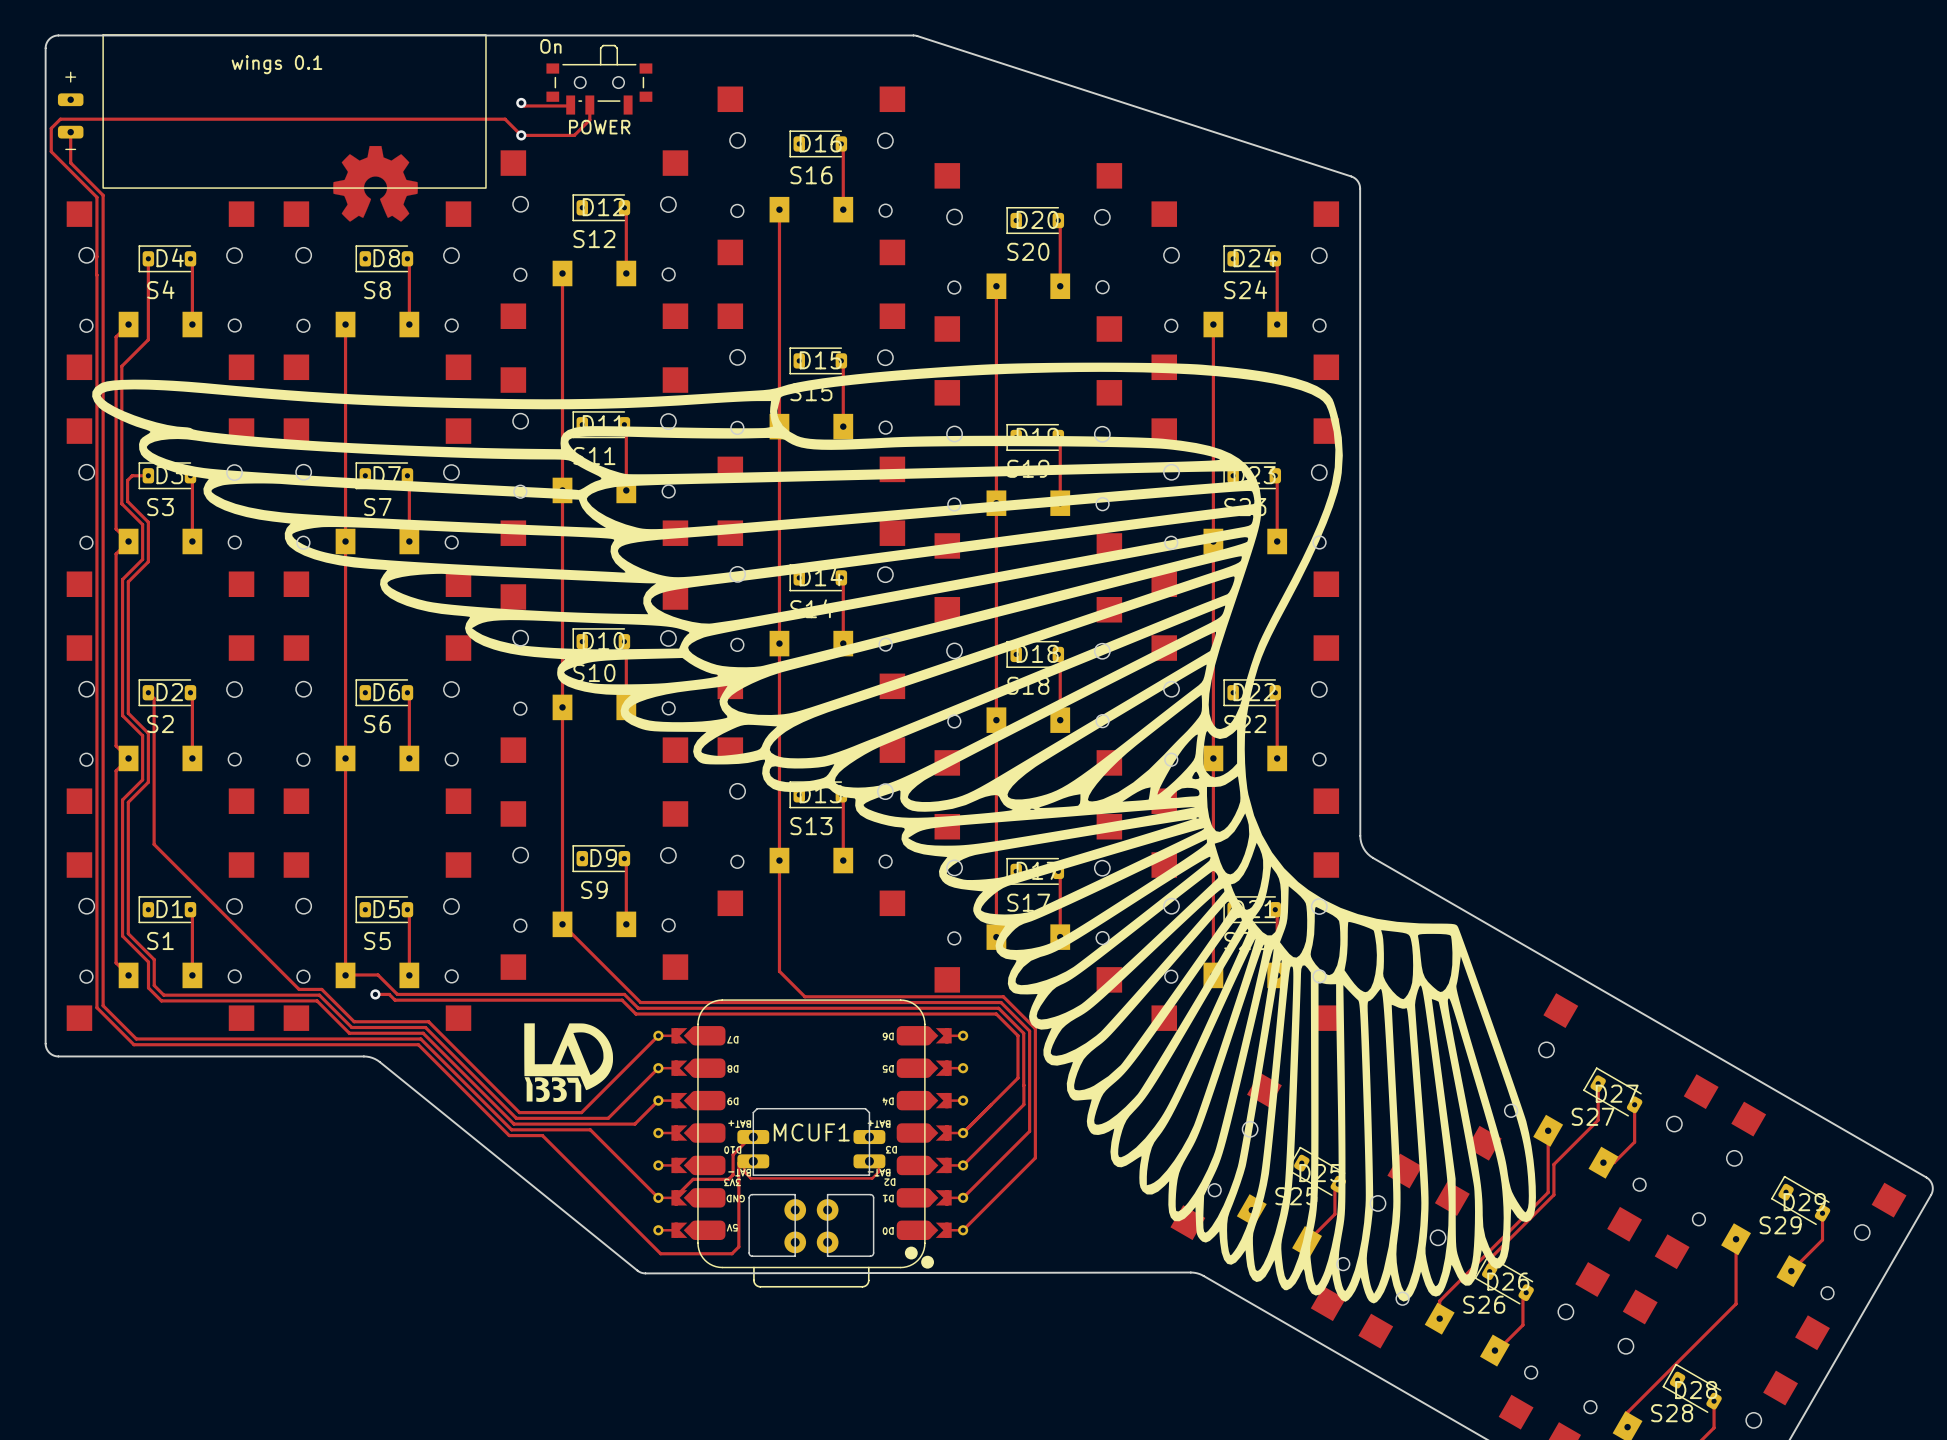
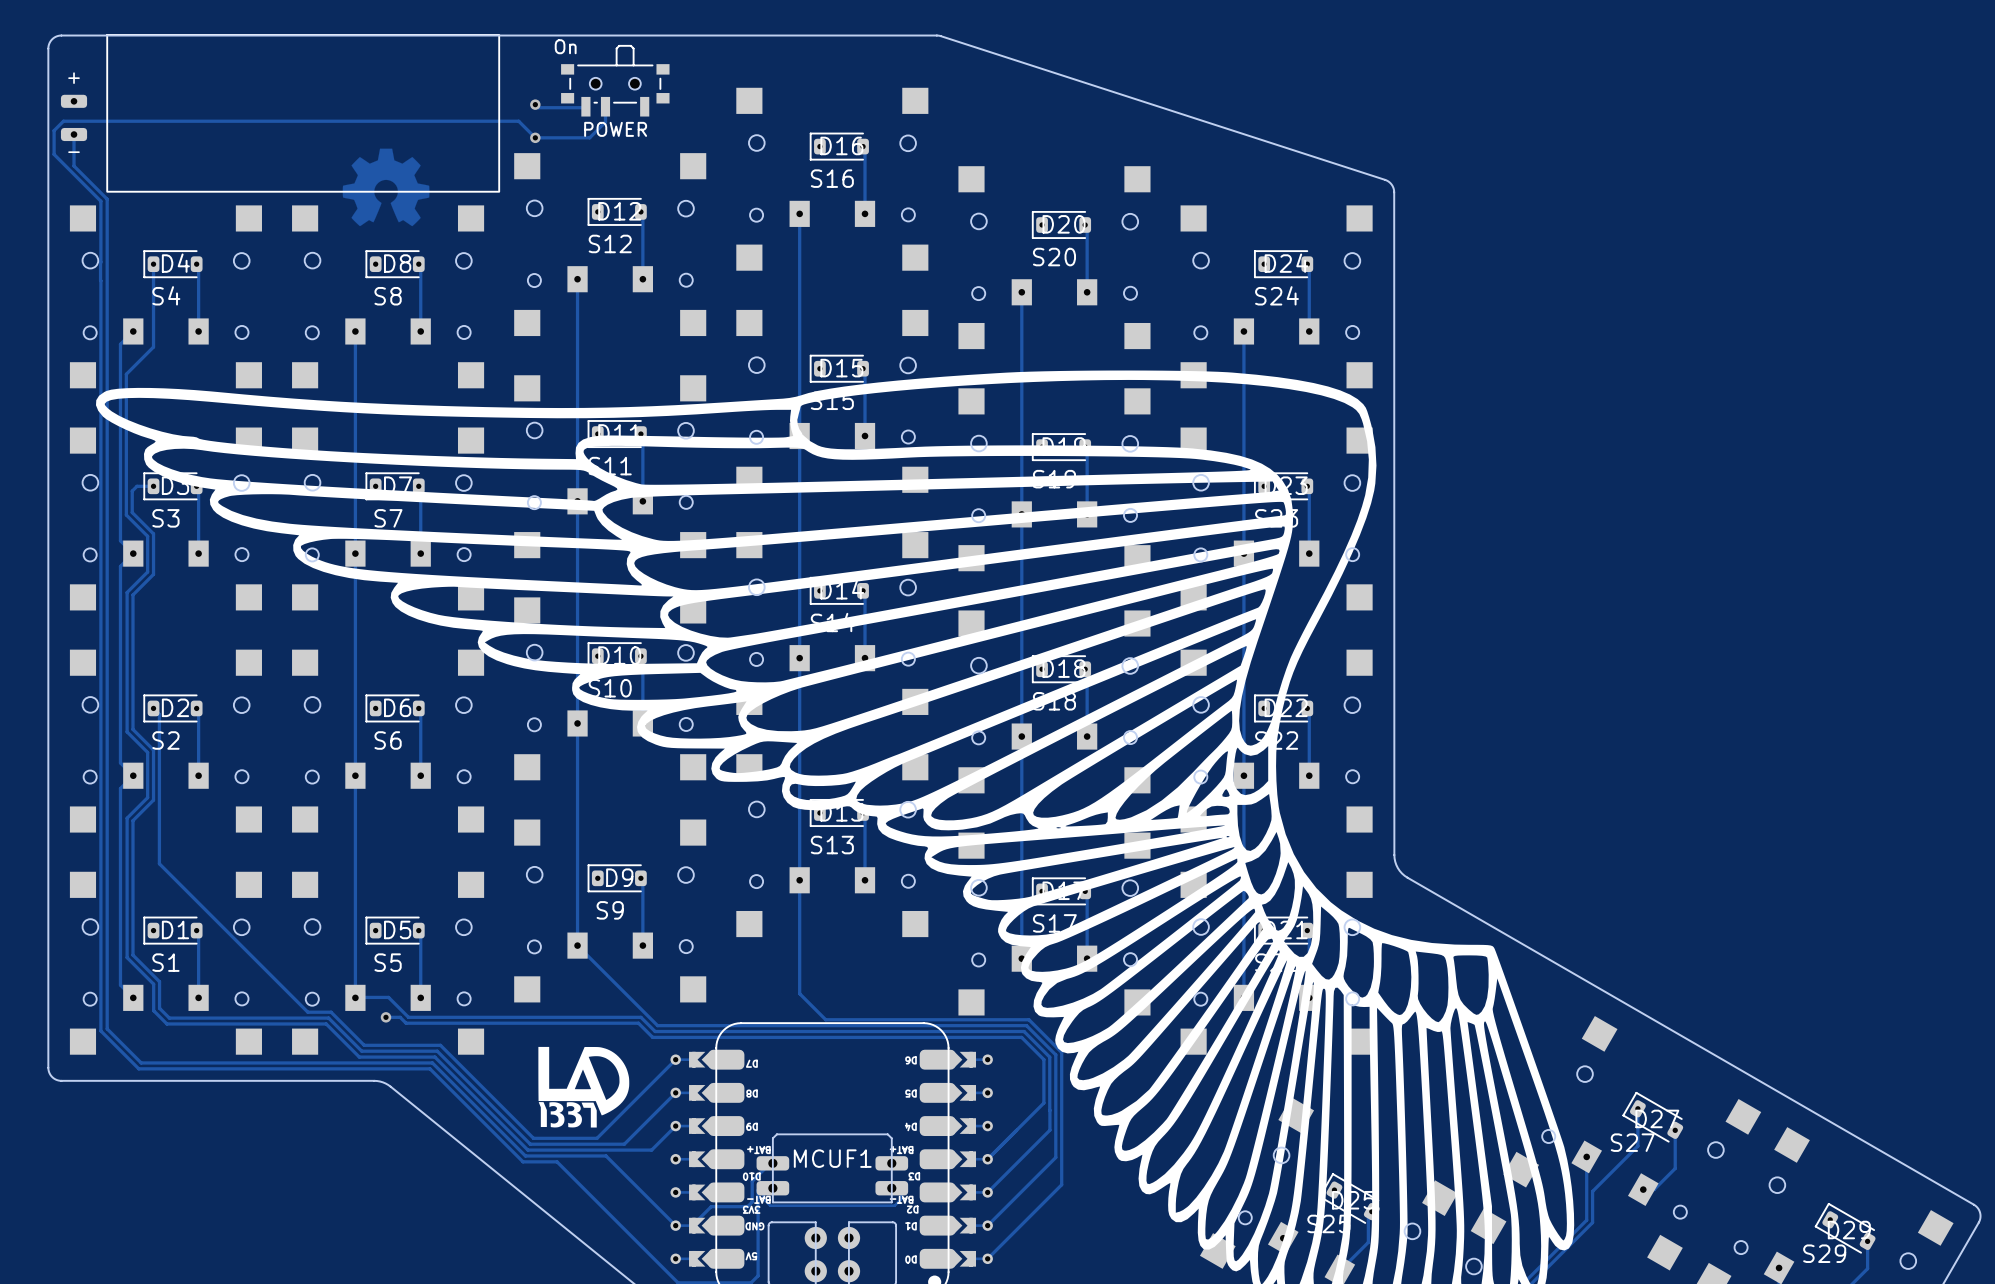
text: wings 0.1 (276, 64) -> none

